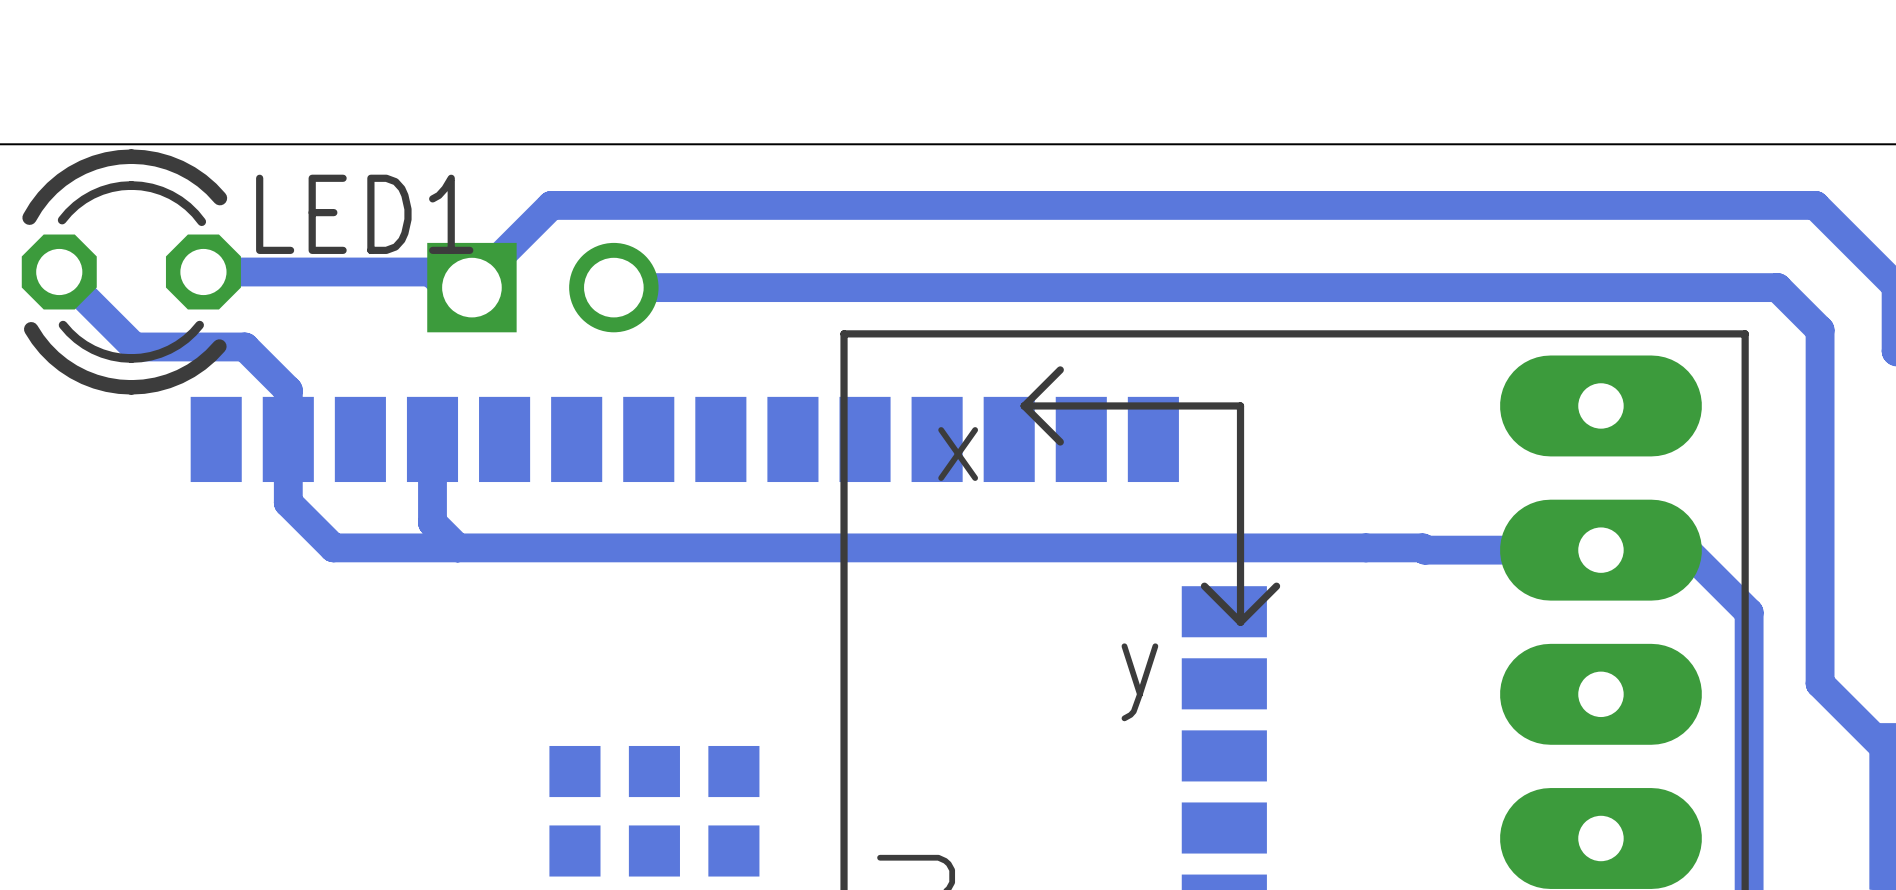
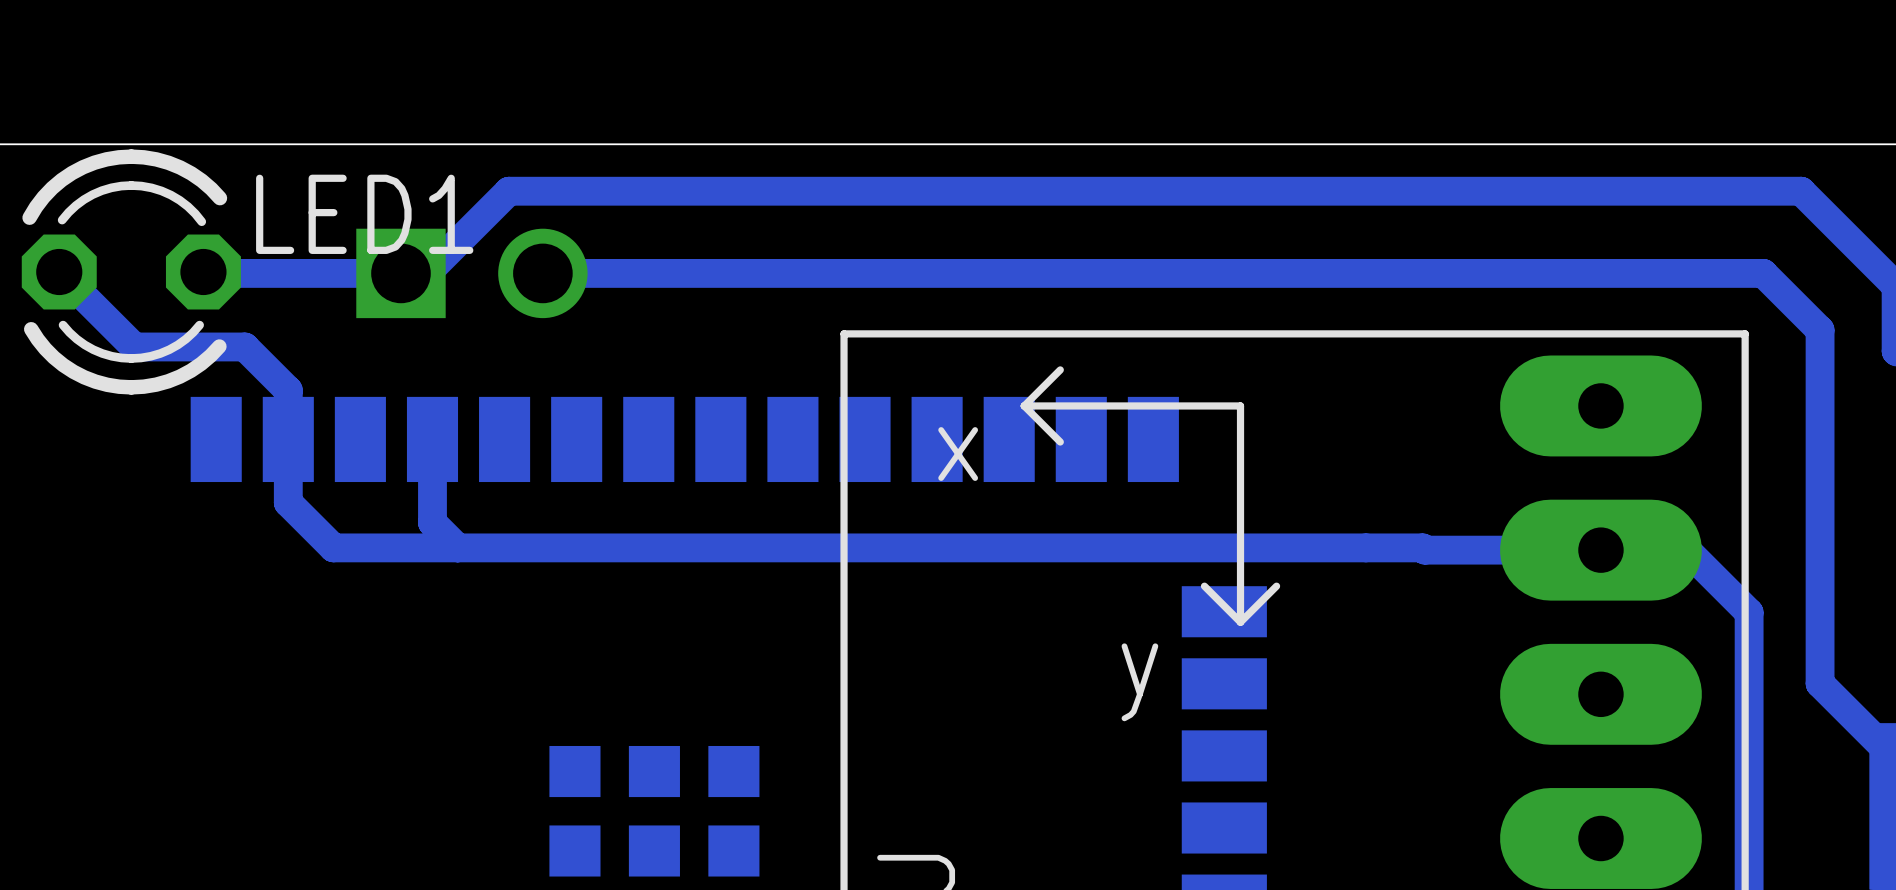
bottom track: (1815, 205) (551, 205) (471, 284) (471, 287) (446, 287) (430, 272) (203, 272) -> (1815, 205) (1801, 191) (508, 191) (426, 273) (203, 272)
part position: (542, 287) -> (471, 273)
bottom track: (613, 287) (1777, 287) -> (542, 273) (1763, 273) (1777, 287)

